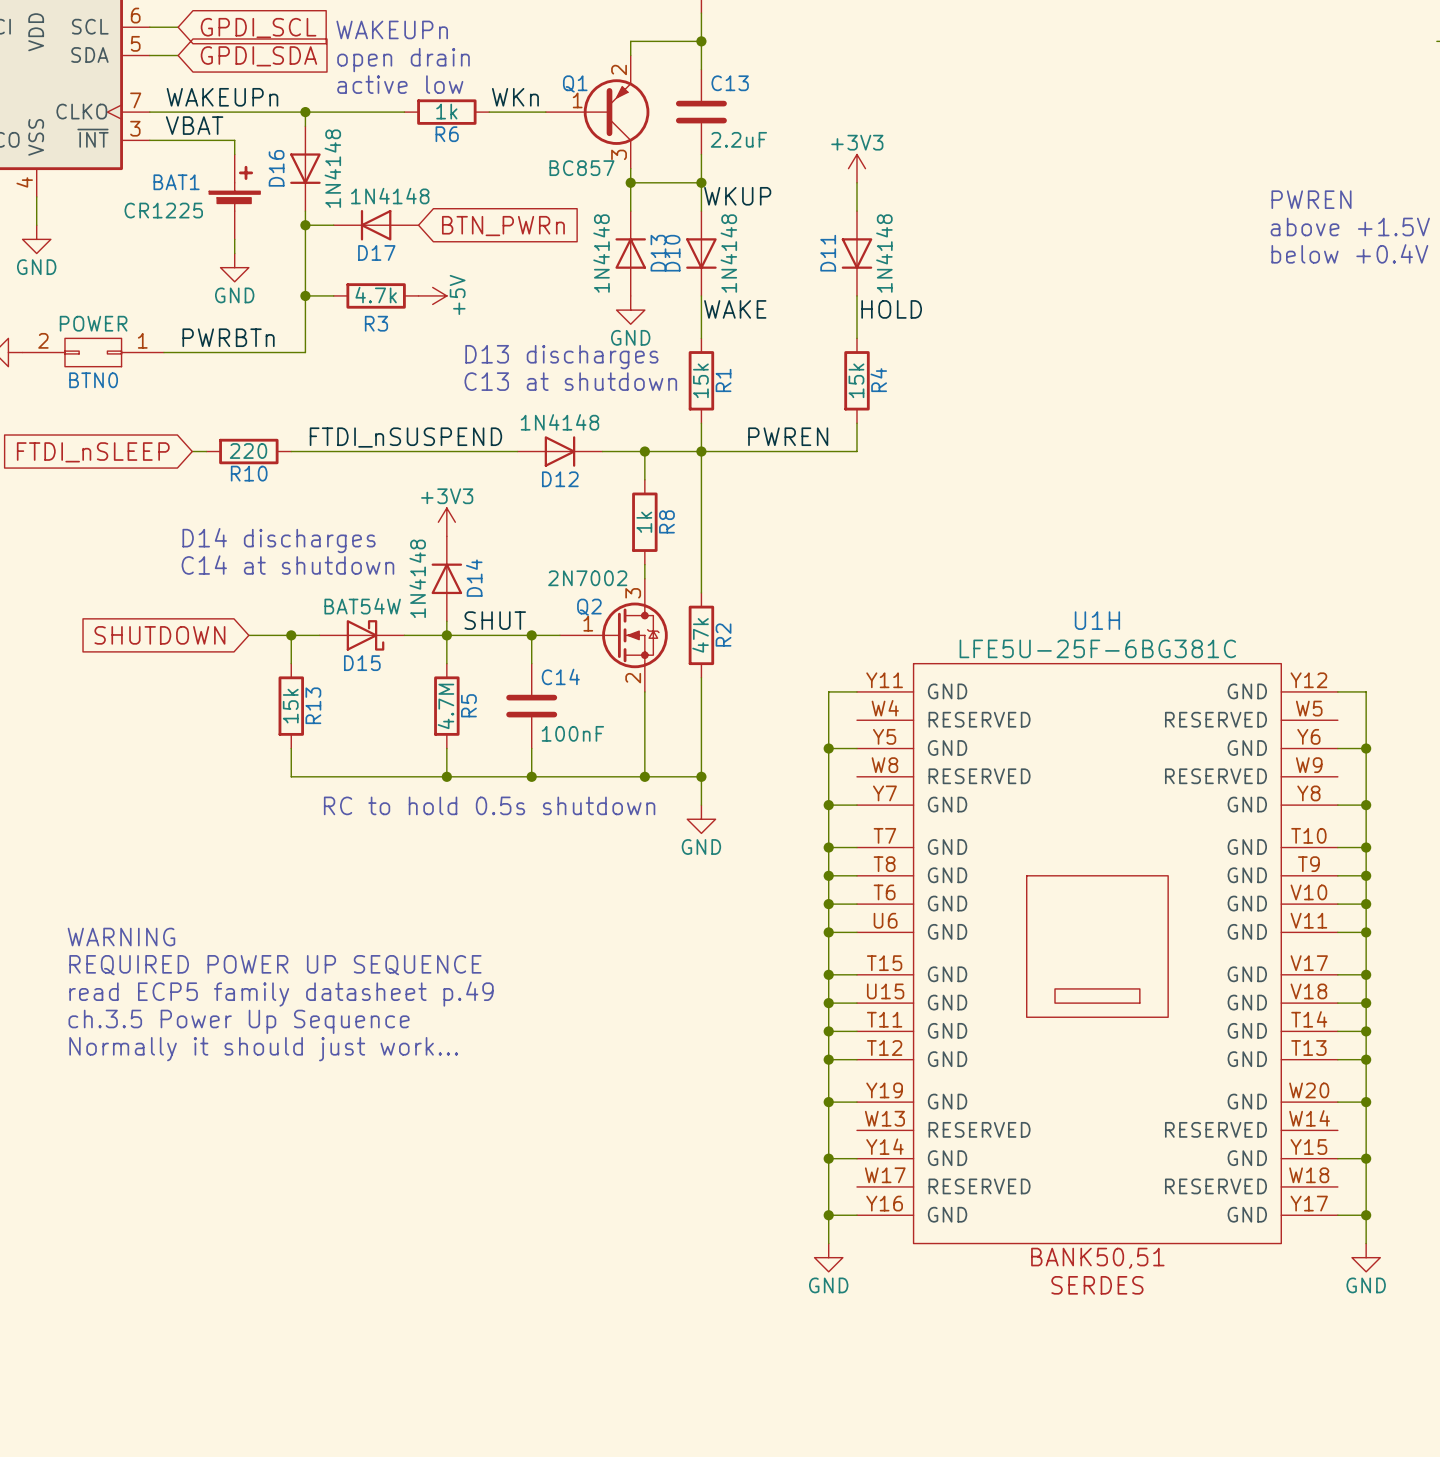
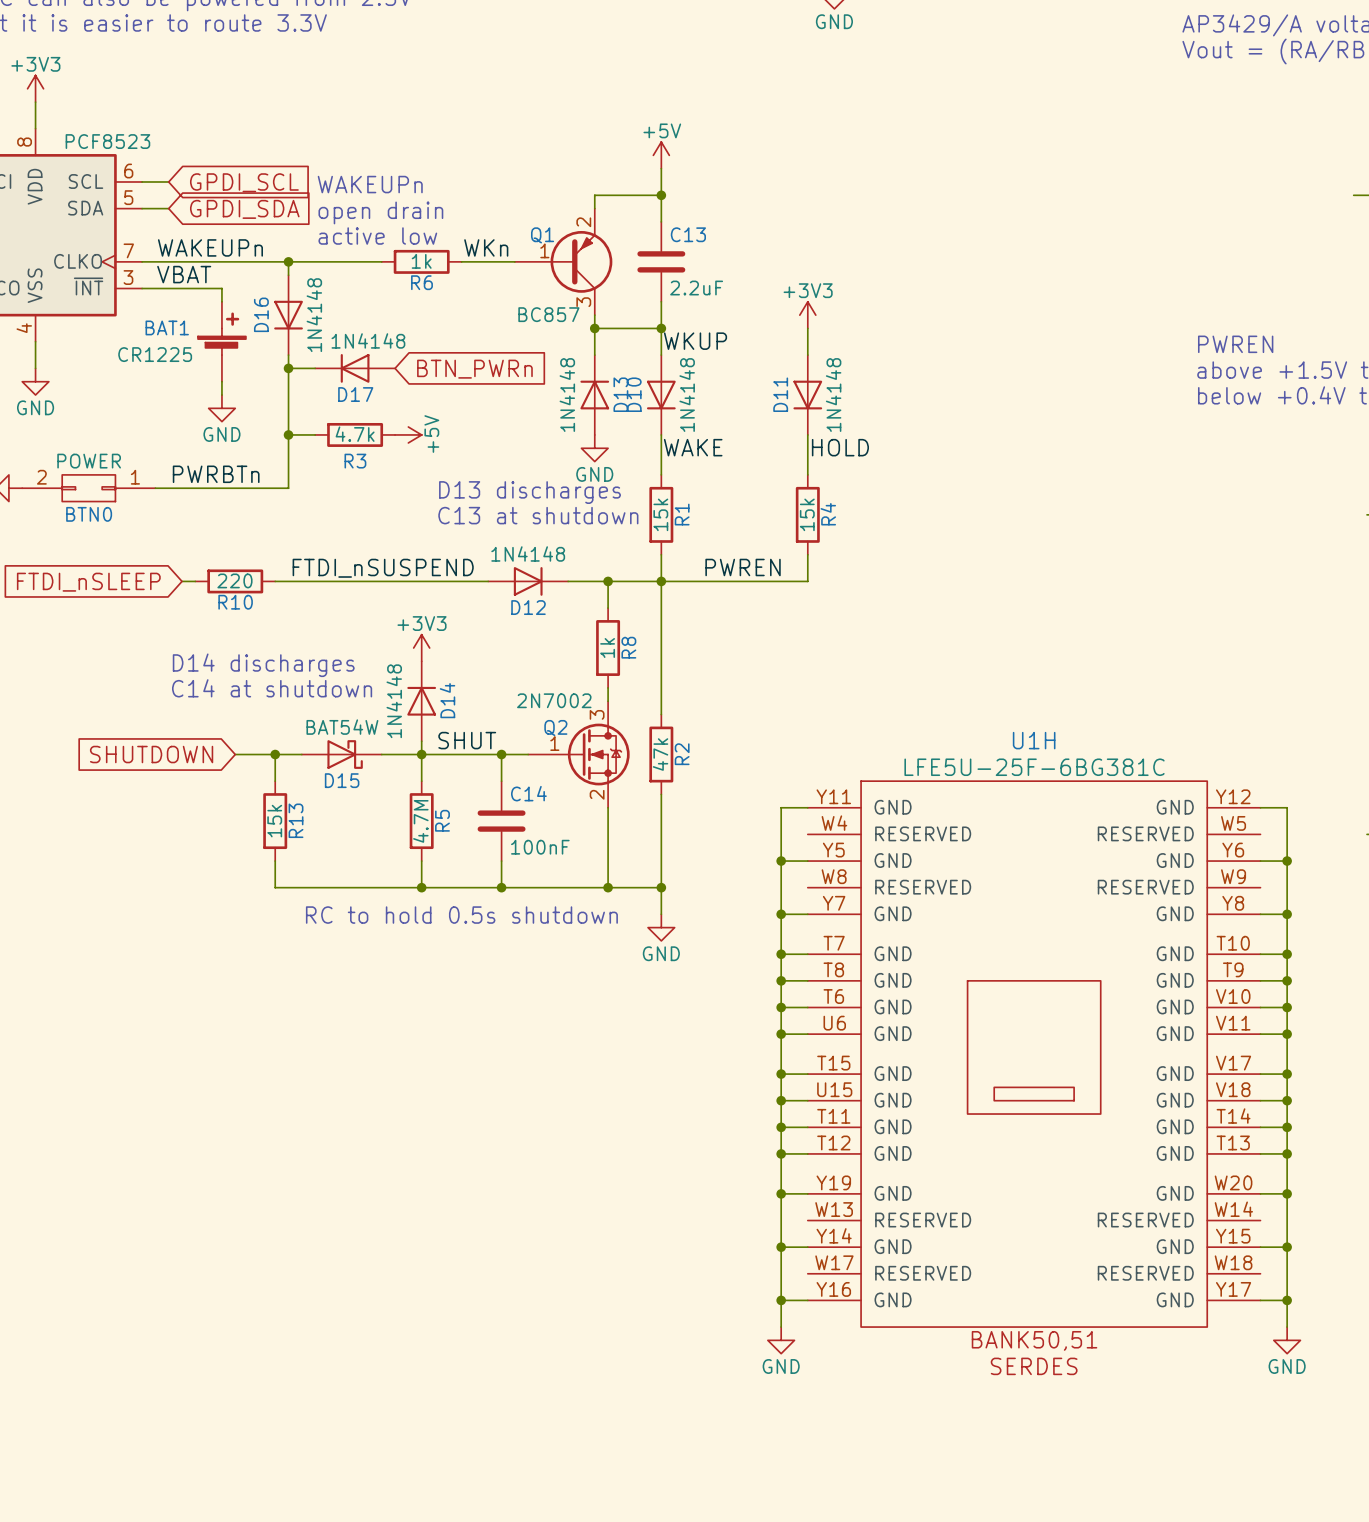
text: WARNING (121, 937) -> none
text: REQUIRED POWER UP SEQUENCE (275, 965) -> none
text: read ECP5 family datasheet p.49 (281, 994) -> none
text: ch.3.5 Power Up Sequence (239, 1021) -> none
text: Normally it should just work... (263, 1049) -> none

